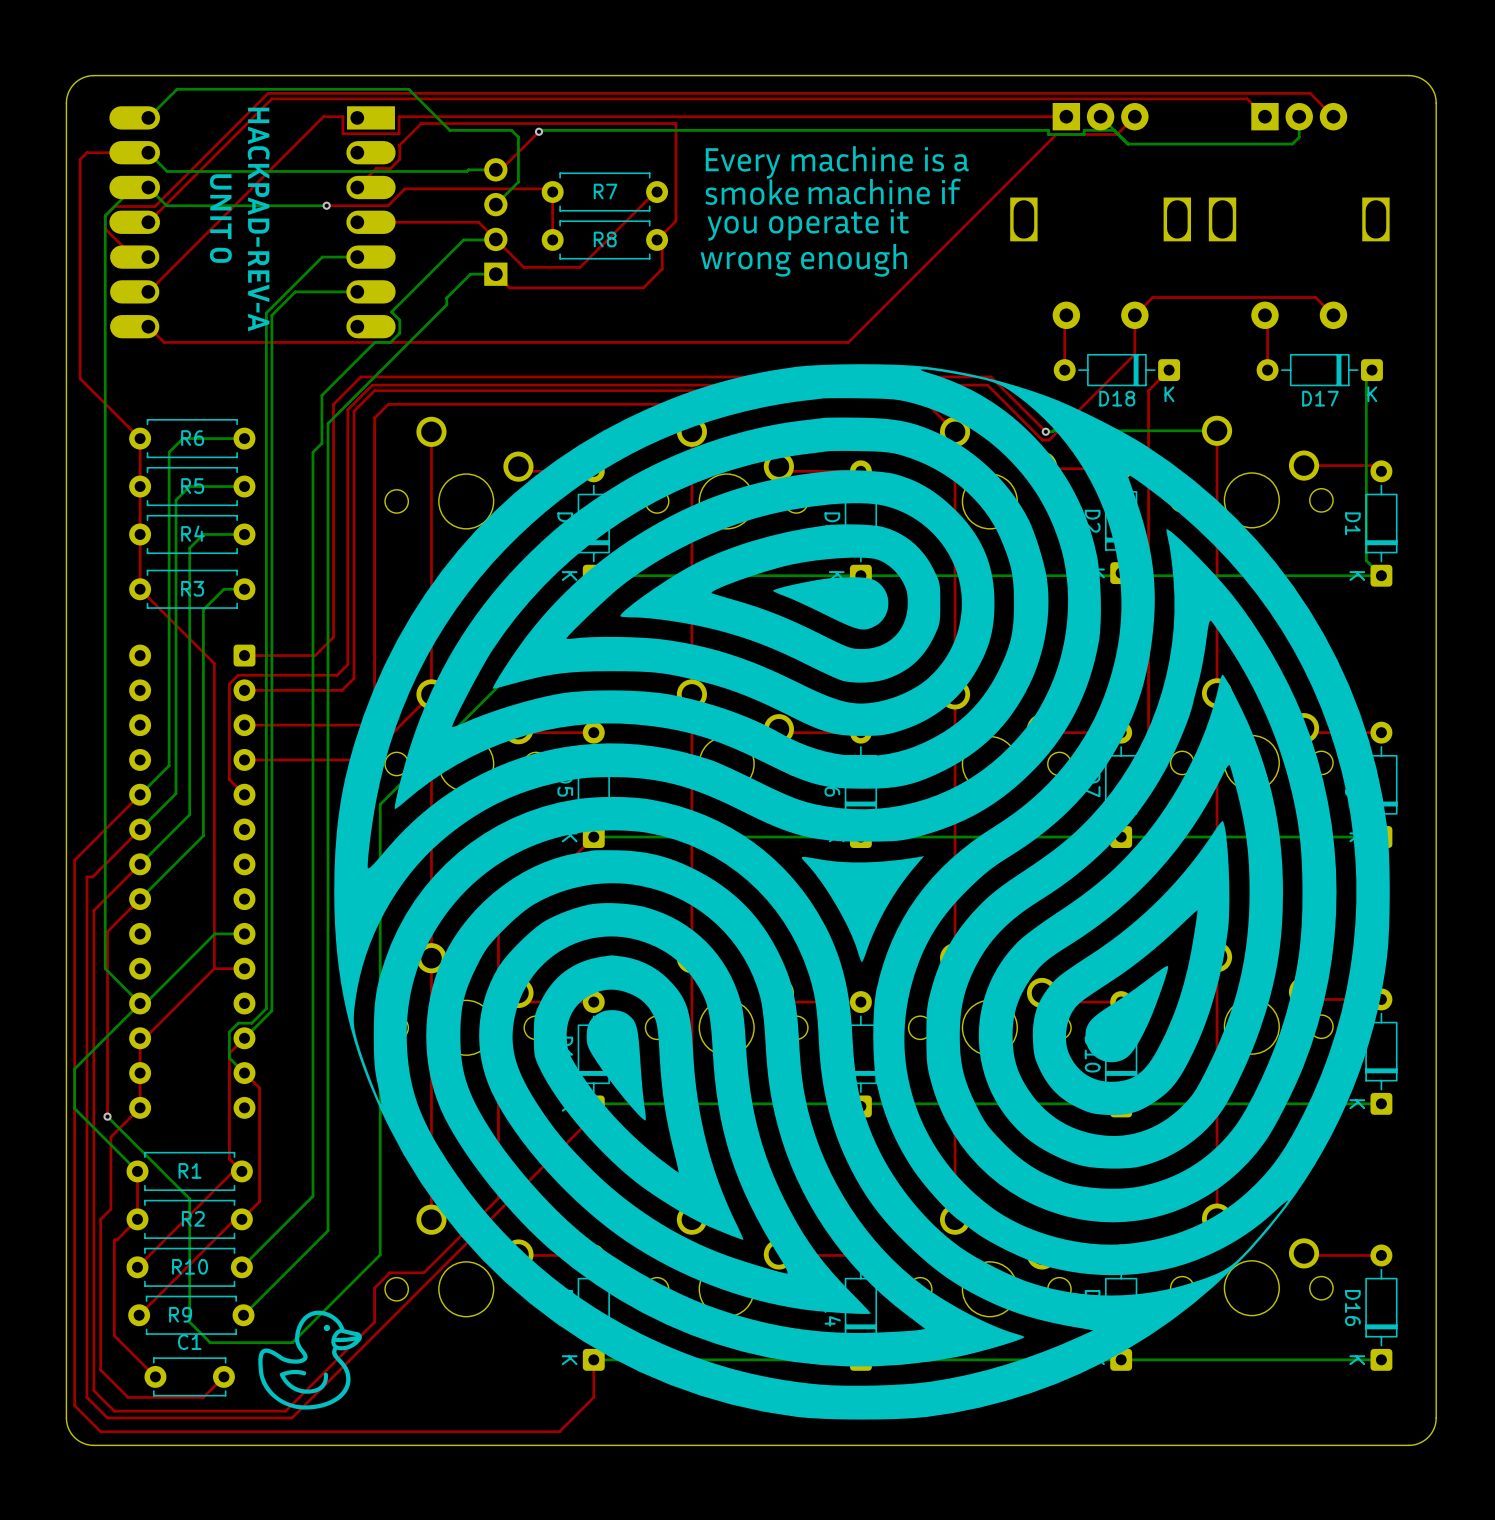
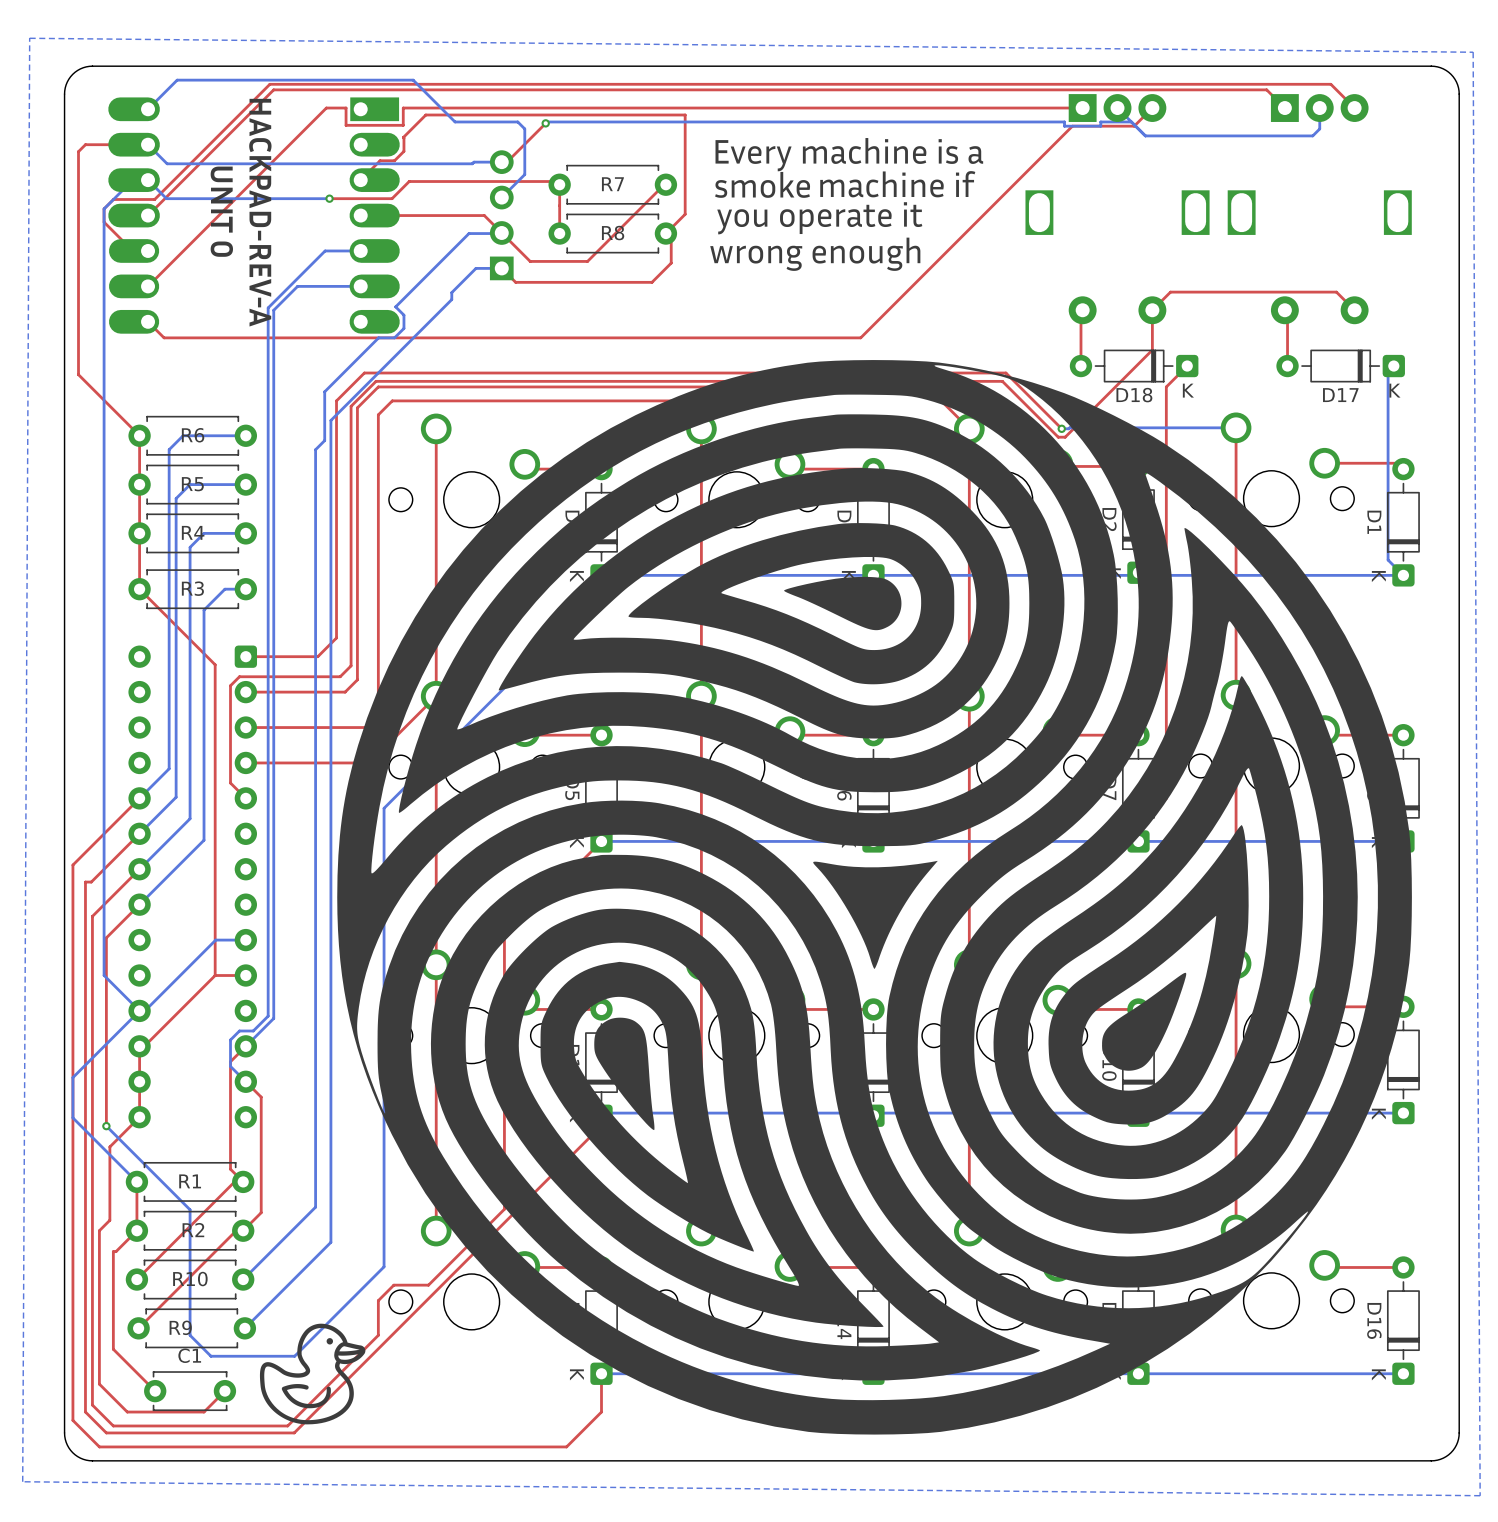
bottom zone outline: none -> (29, 38) (22, 1481) (1480, 1495) (1473, 52) (29, 38)

